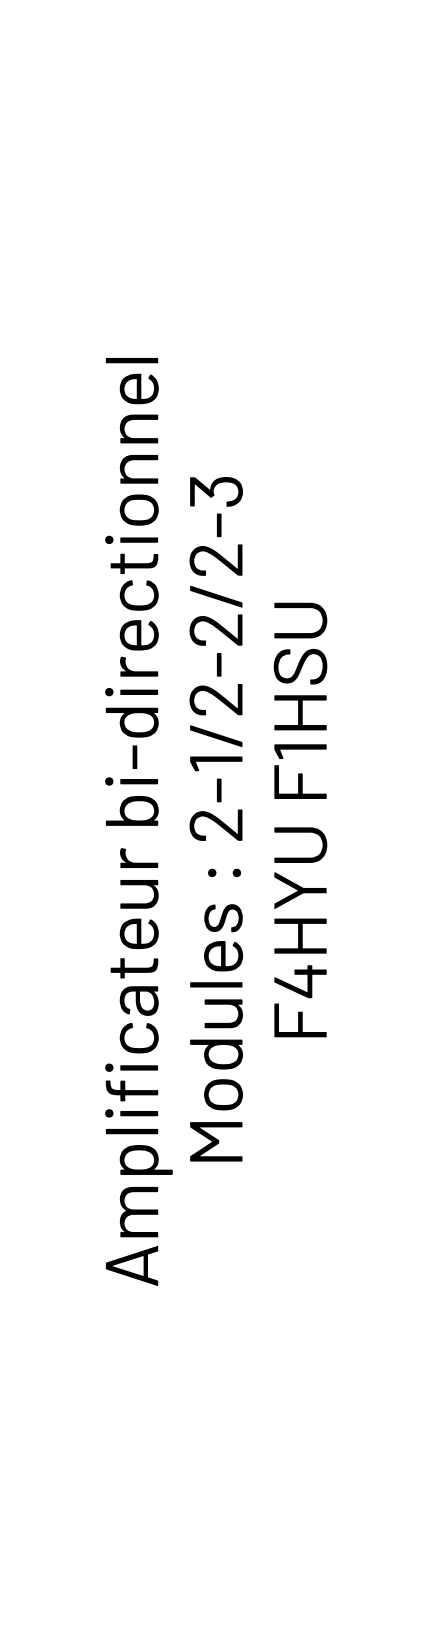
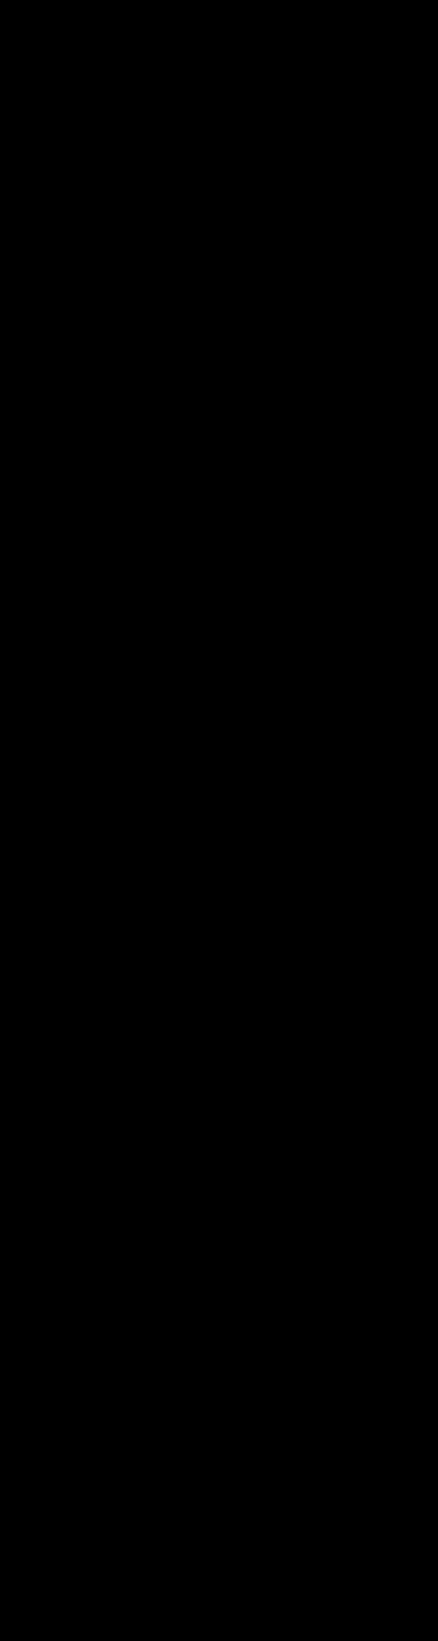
text: Modules : 2-1/2-2/2-3 (216, 819) -> none
text: F4HYU F1HSU (300, 820) -> none
text: Amplificateur bi-directionnel (138, 822) -> none

